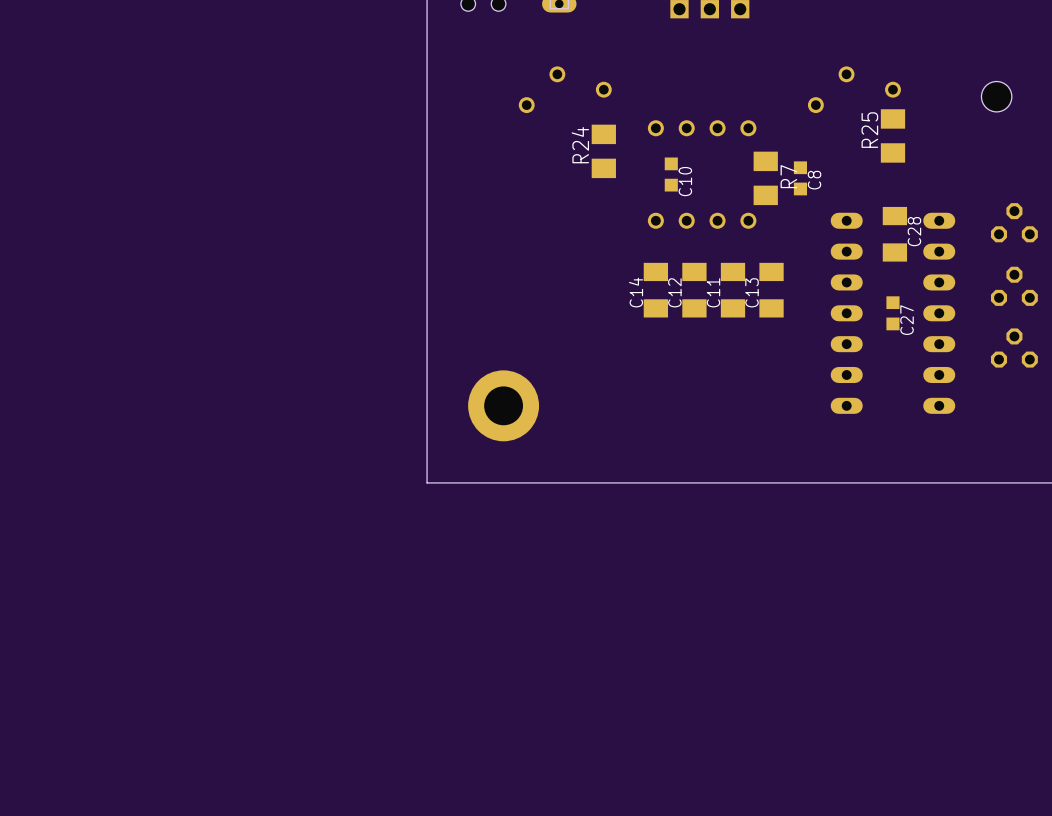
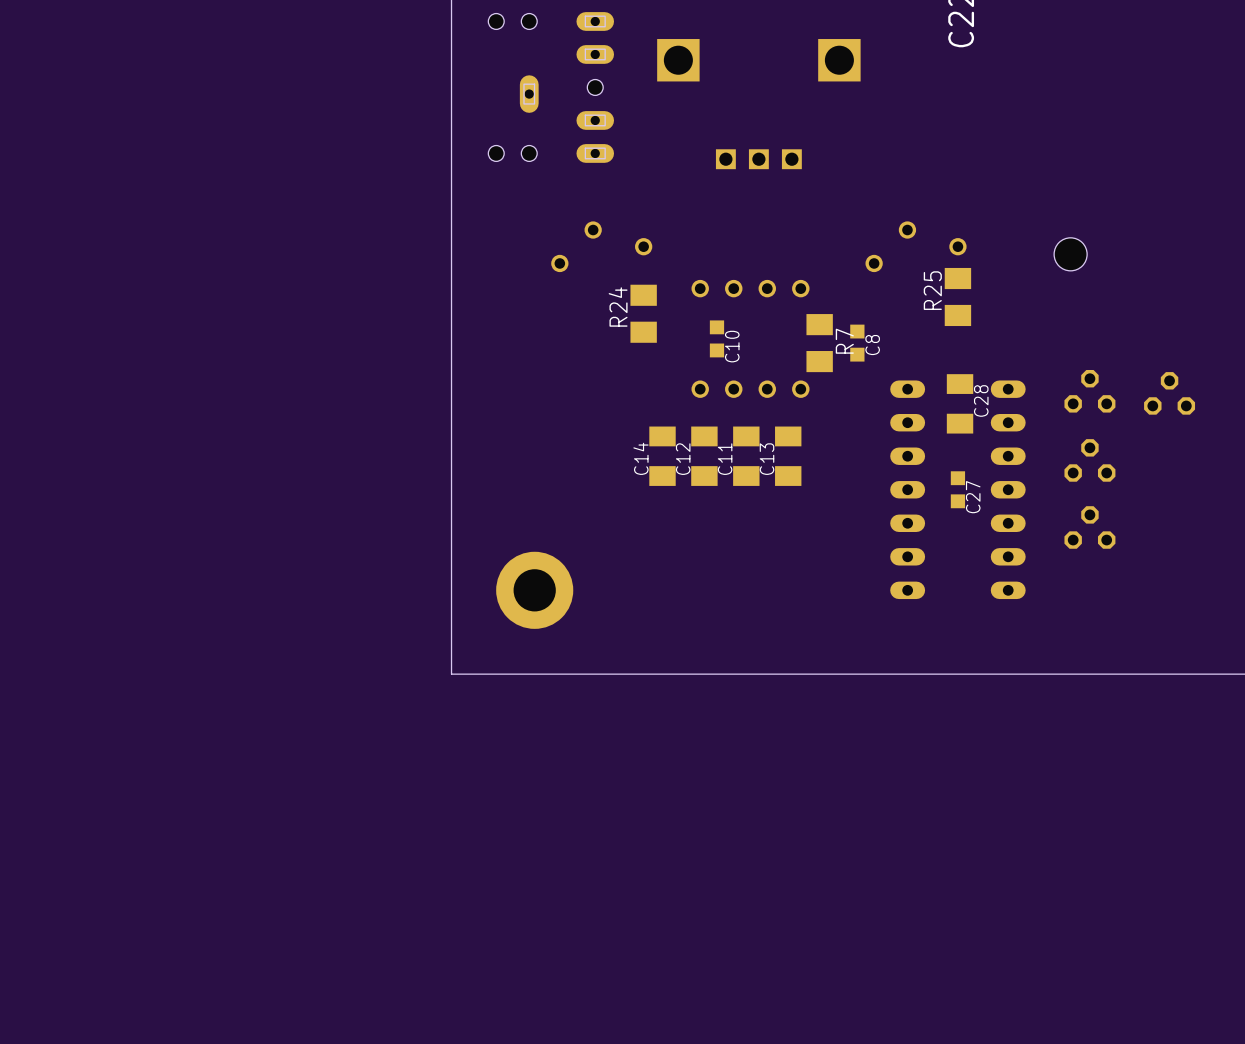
C14 position: (655, 290) -> (662, 456)
C12 position: (694, 290) -> (704, 456)
C11 position: (732, 290) -> (746, 456)
C13 position: (771, 290) -> (788, 456)

